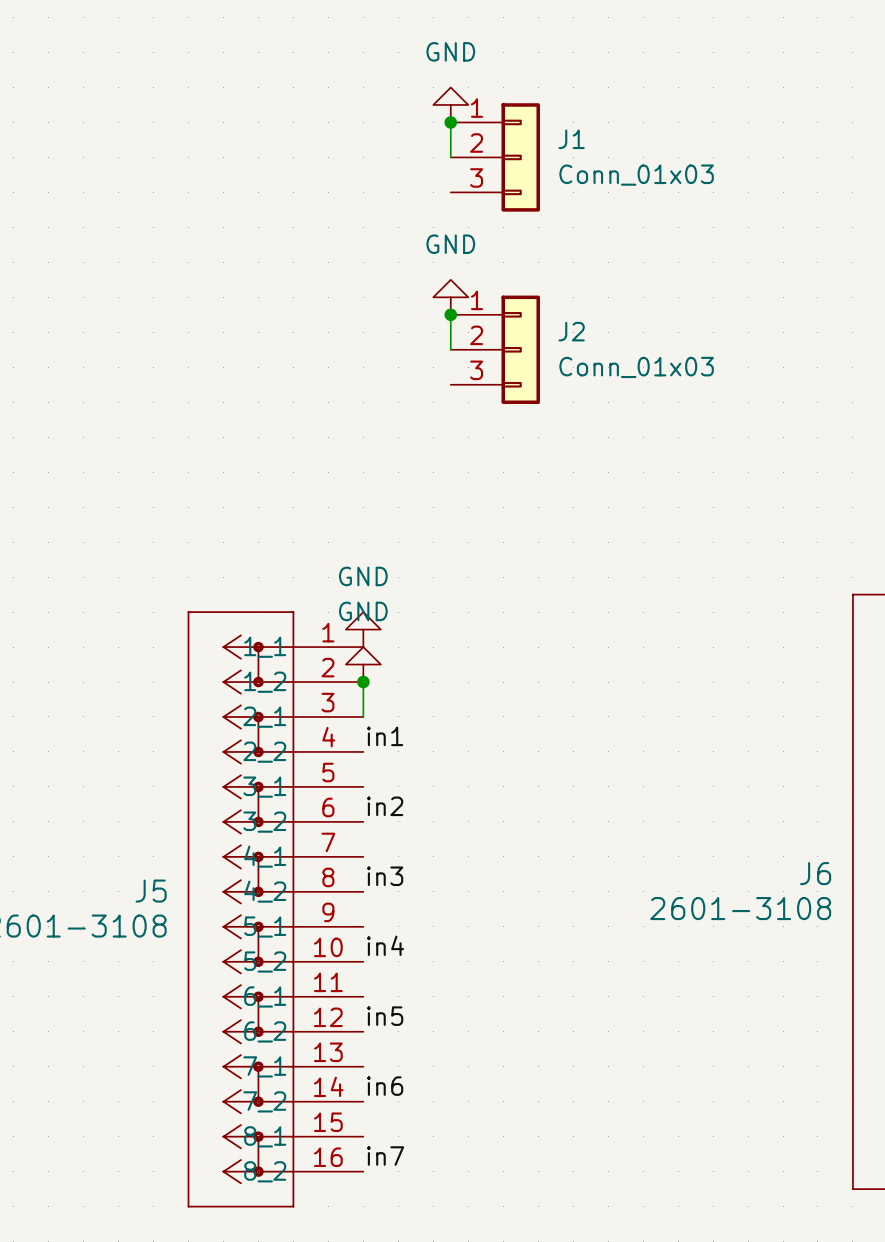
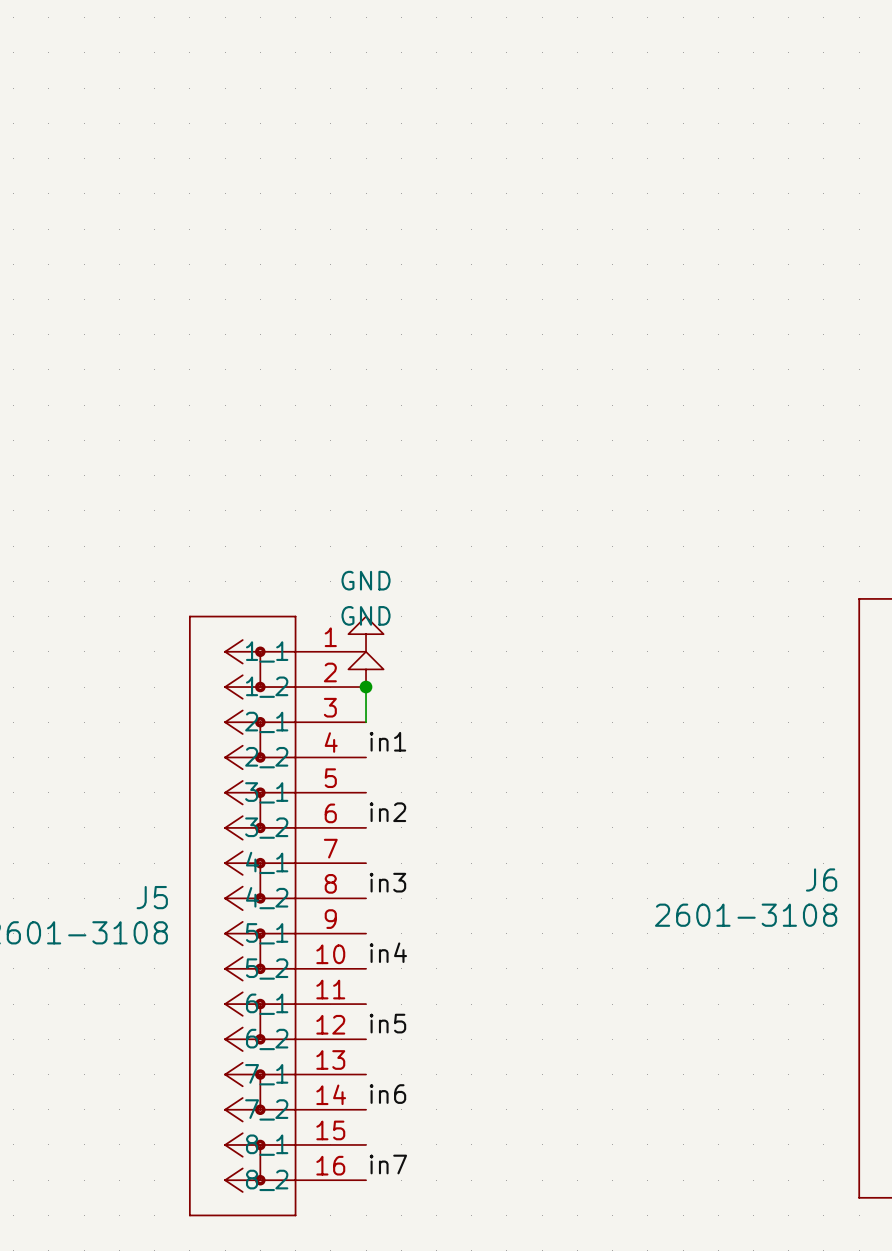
power symbol: GND (450, 104) -> none
wire: (450, 122) (450, 157) -> none
junction: (450, 122) -> none
J1: Conn_01x03 (495, 157) -> none
power symbol: GND (450, 297) -> none
wire: (450, 314) (450, 349) -> none
junction: (450, 314) -> none
J2: Conn_01x03 (495, 349) -> none

